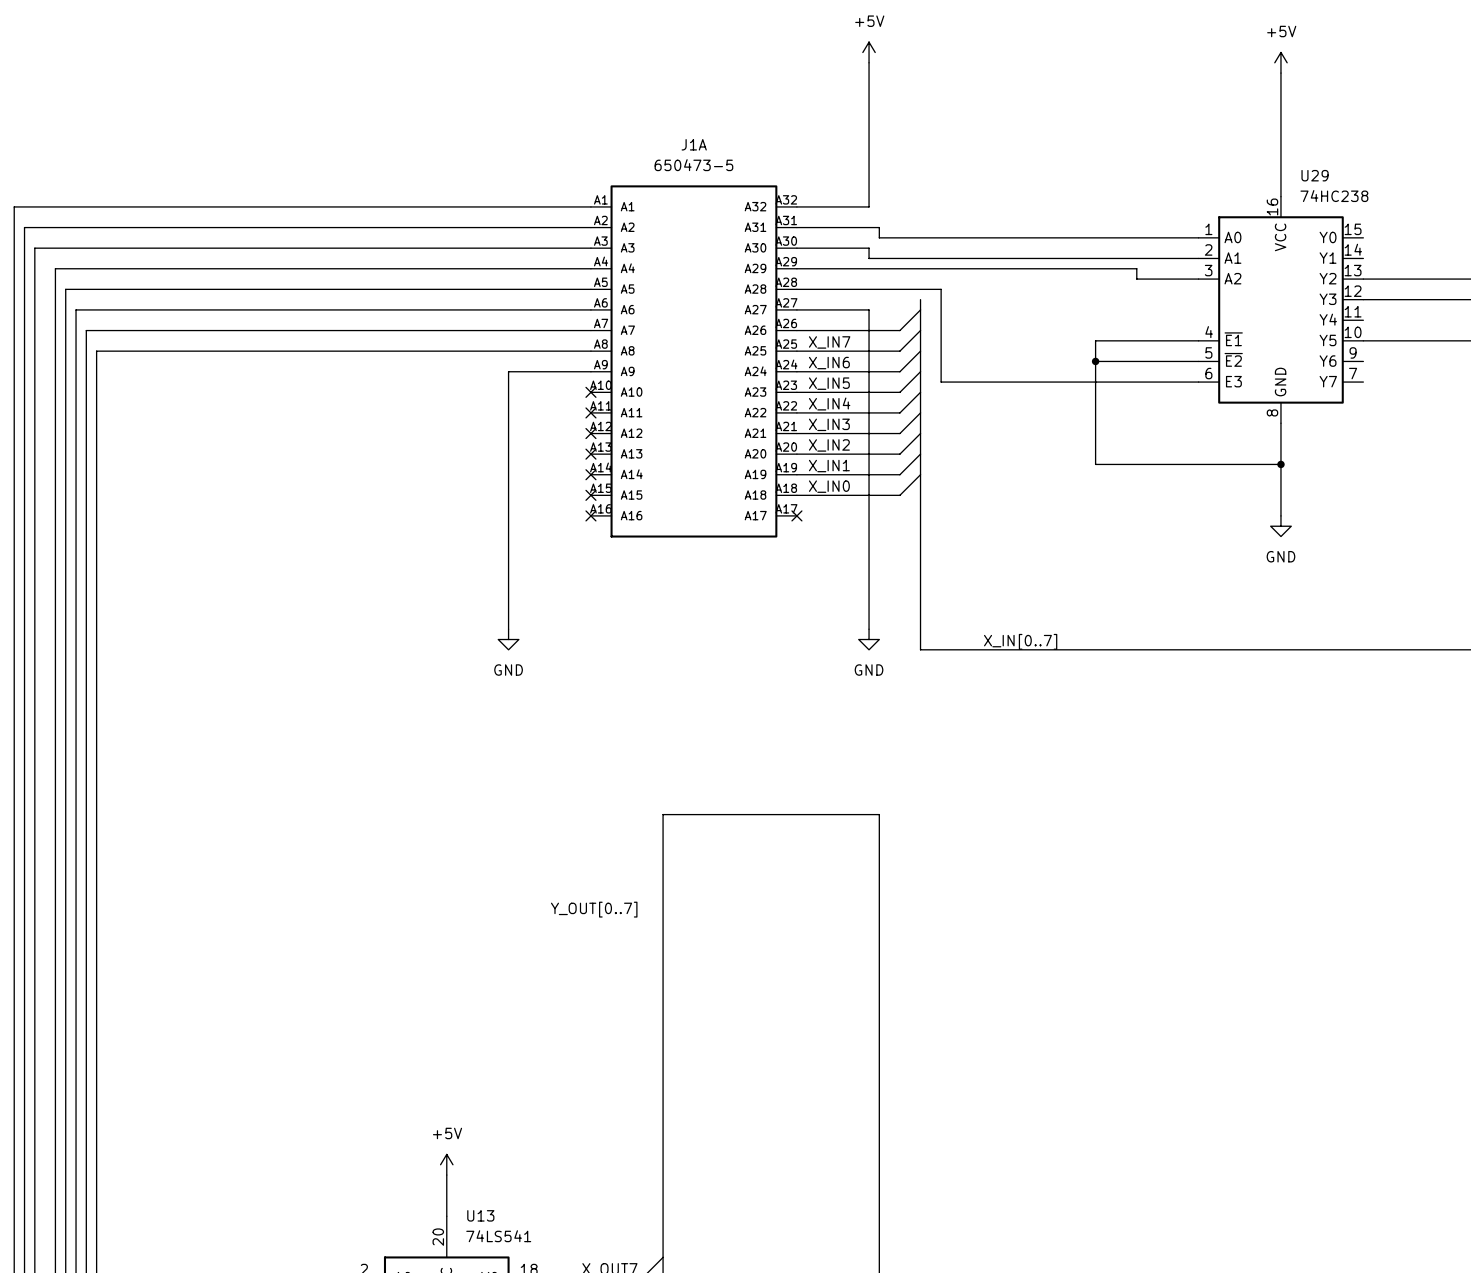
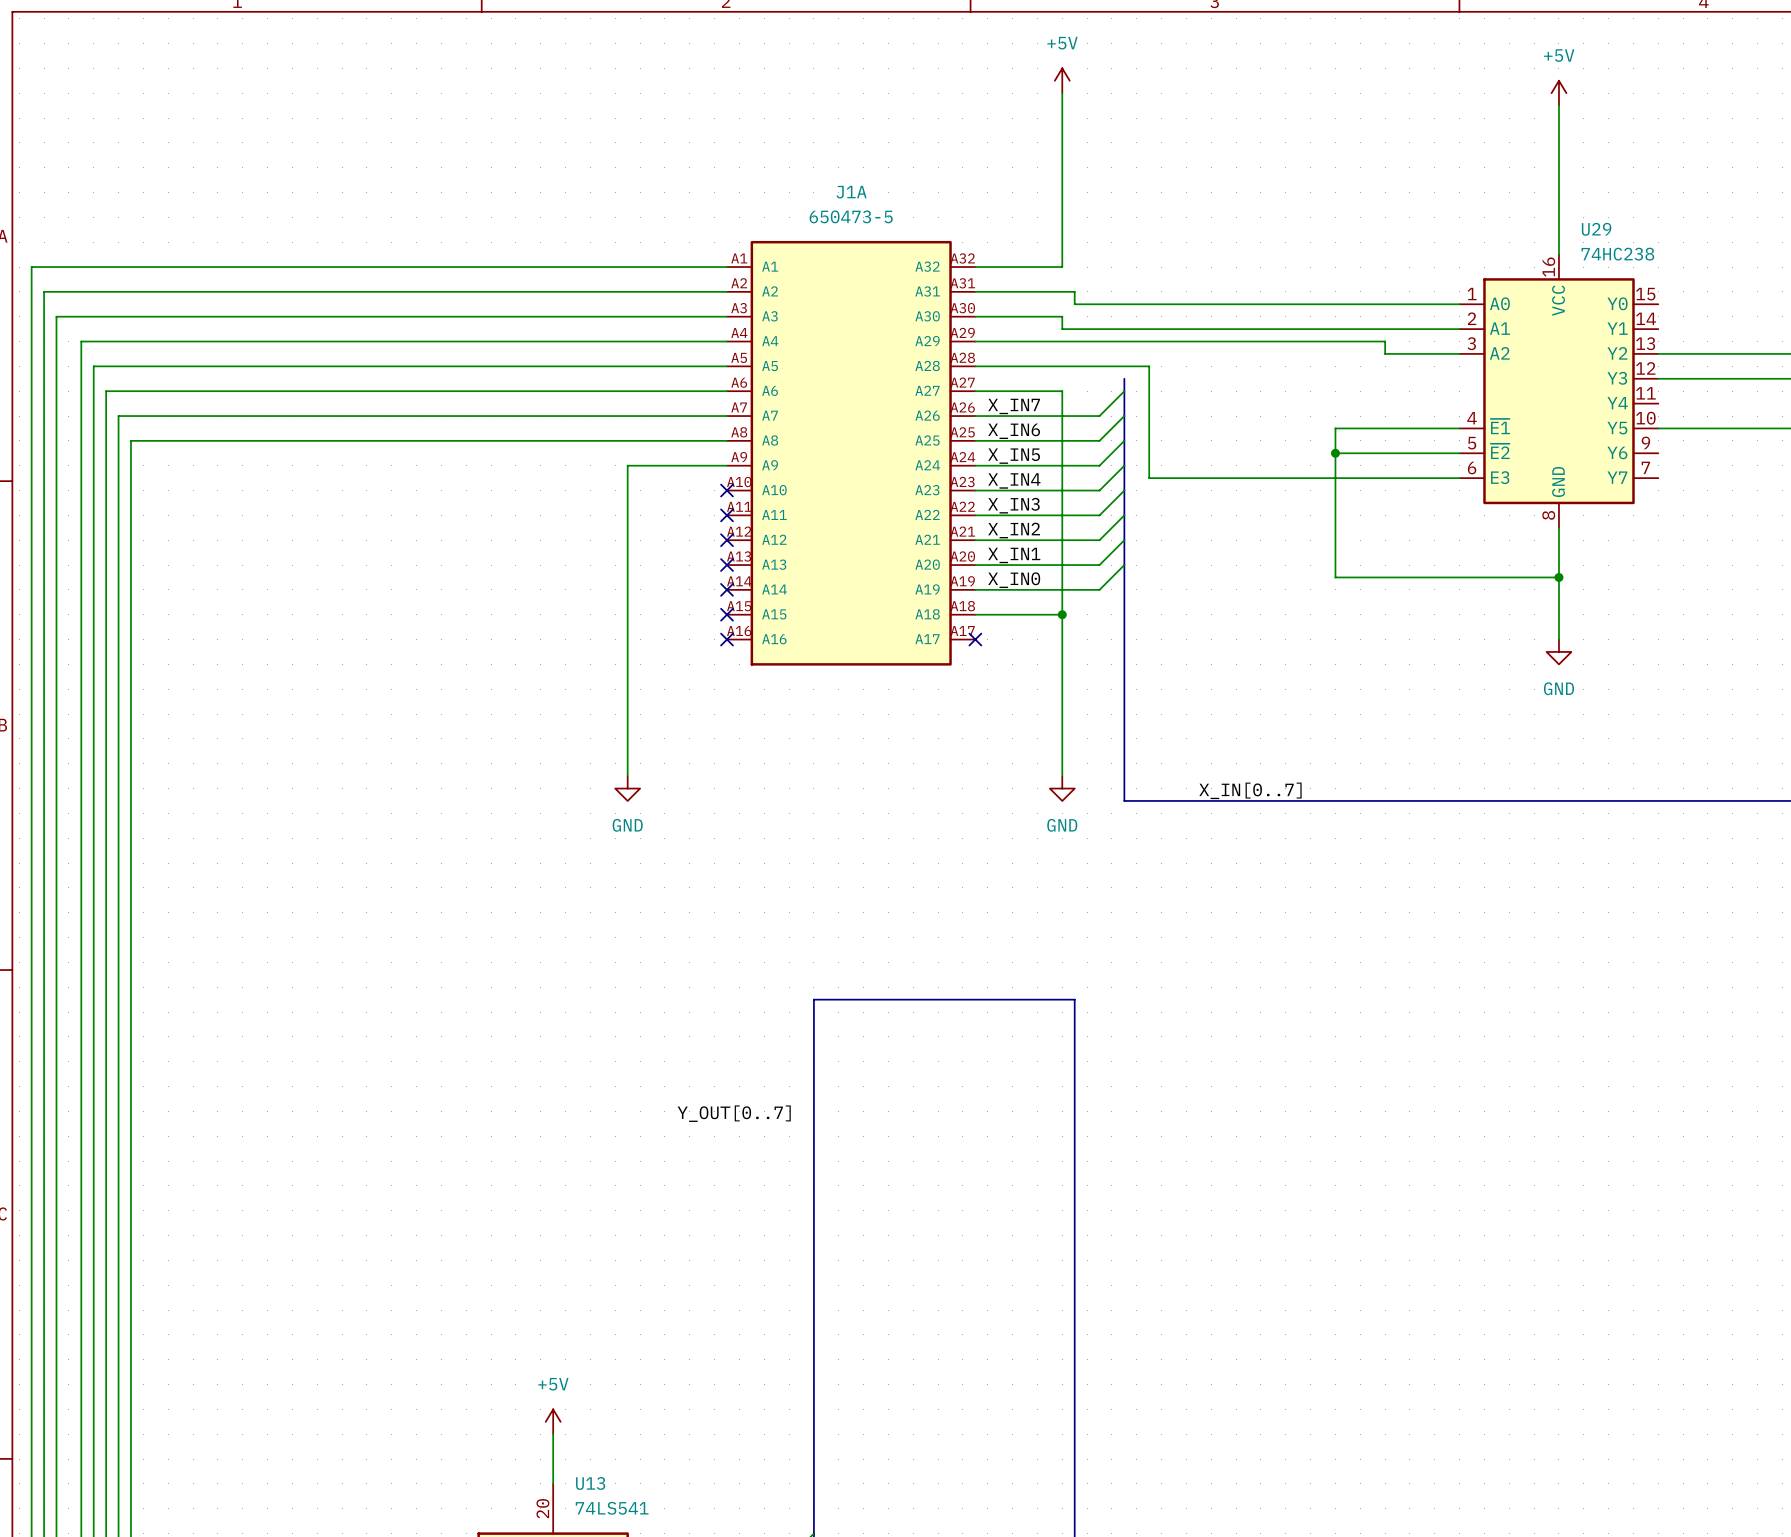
label: none -> X_IN7 (1014, 406)
label: X_IN7 (829, 342) -> X_IN6 (1014, 431)
label: X_IN6 (829, 363) -> X_IN5 (1014, 456)
label: X_IN5 (829, 383) -> X_IN4 (1014, 480)
label: X_IN4 (829, 403) -> X_IN3 (1013, 505)
label: X_IN3 (829, 424) -> X_IN2 (1014, 530)
label: X_IN2 (829, 445) -> X_IN1 (1014, 555)
label: X_IN1 (829, 466) -> X_IN0 (1014, 580)
wire: (920, 474) (899, 495) (869, 495) -> none
label: X_IN0 (829, 486) -> none
junction: none -> (1062, 614)

